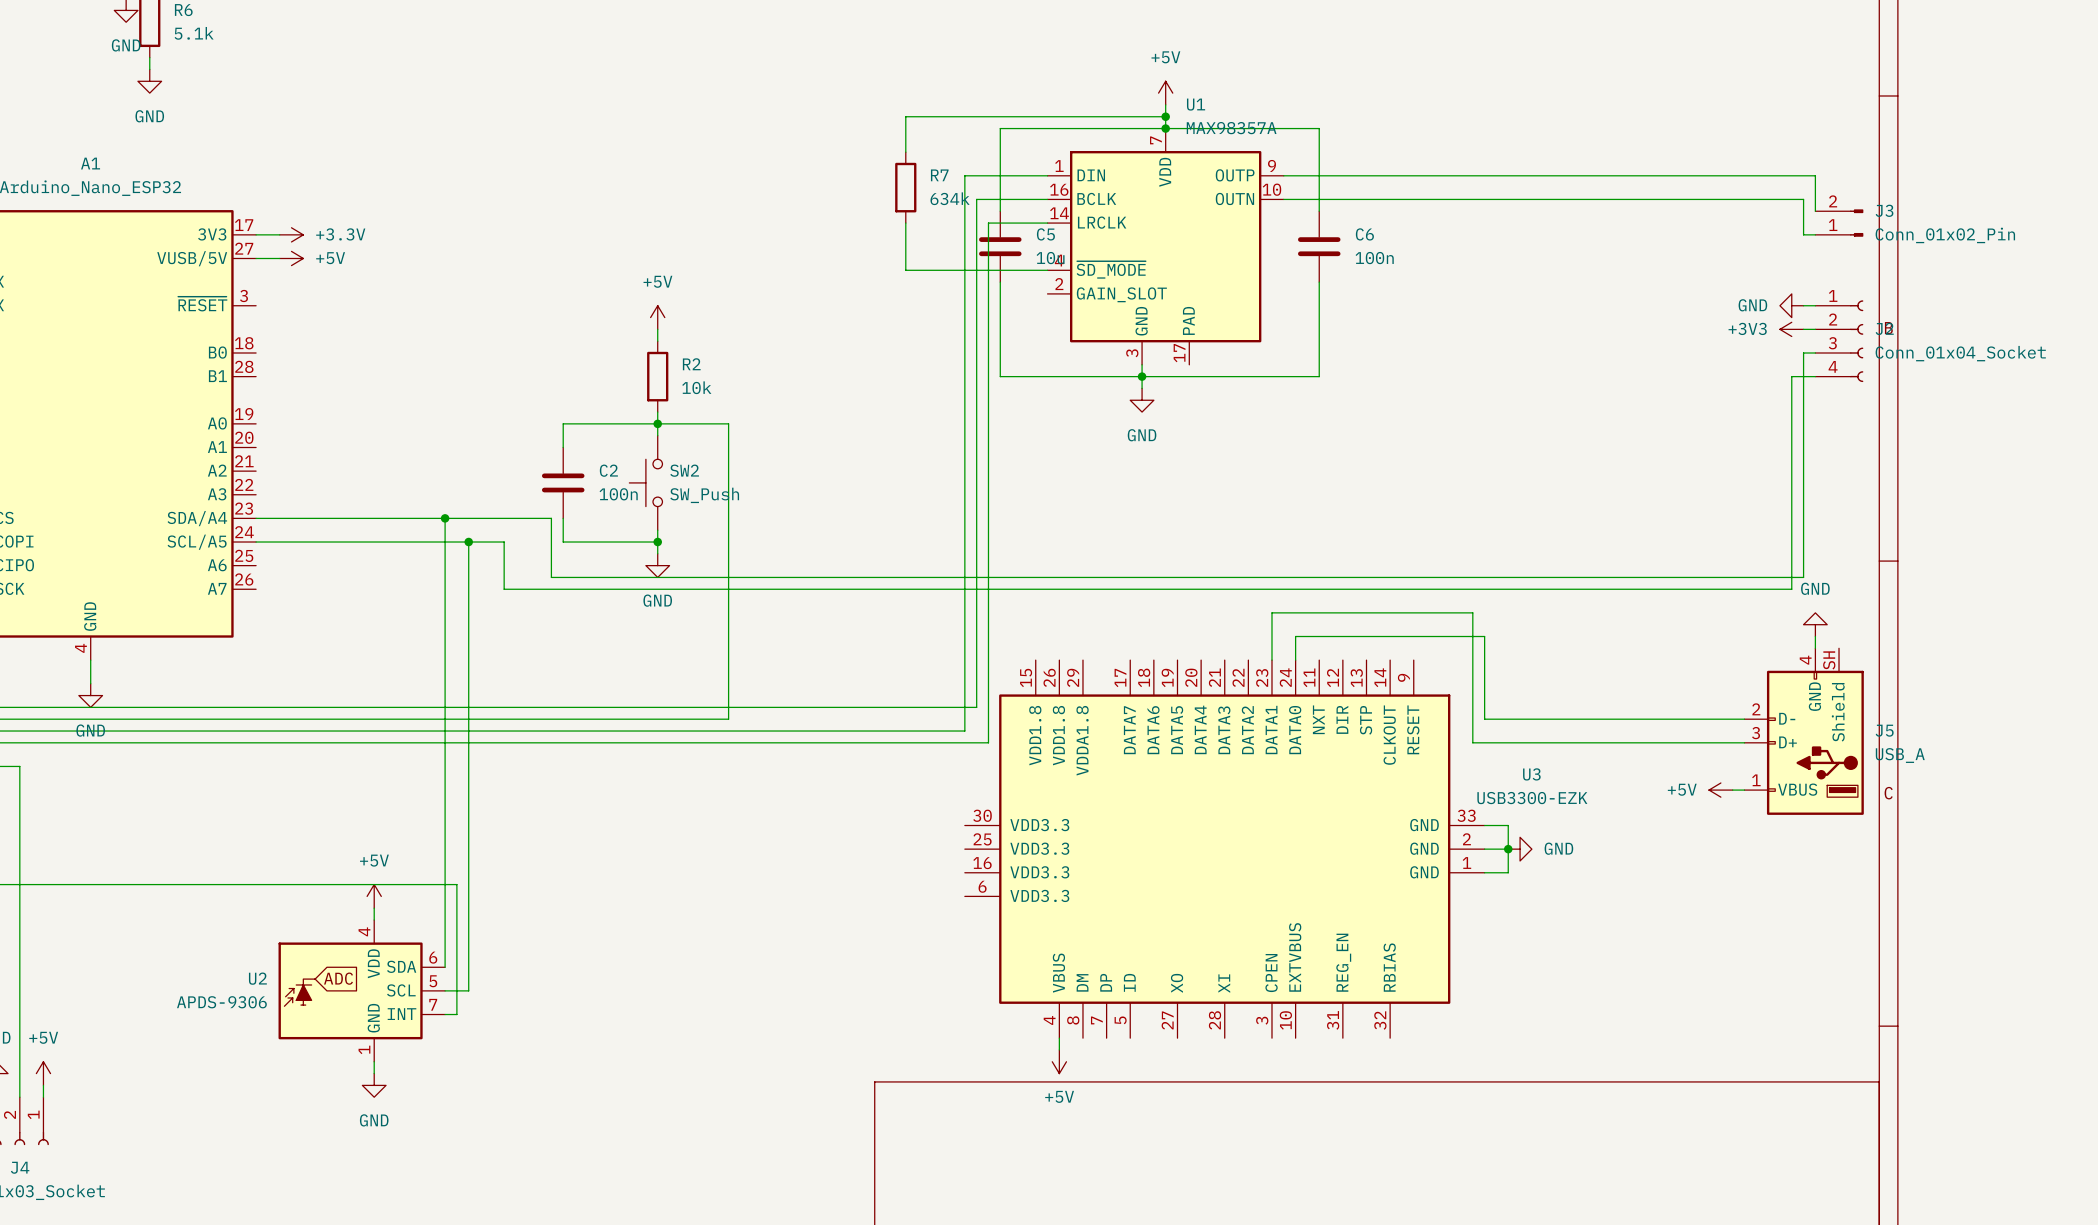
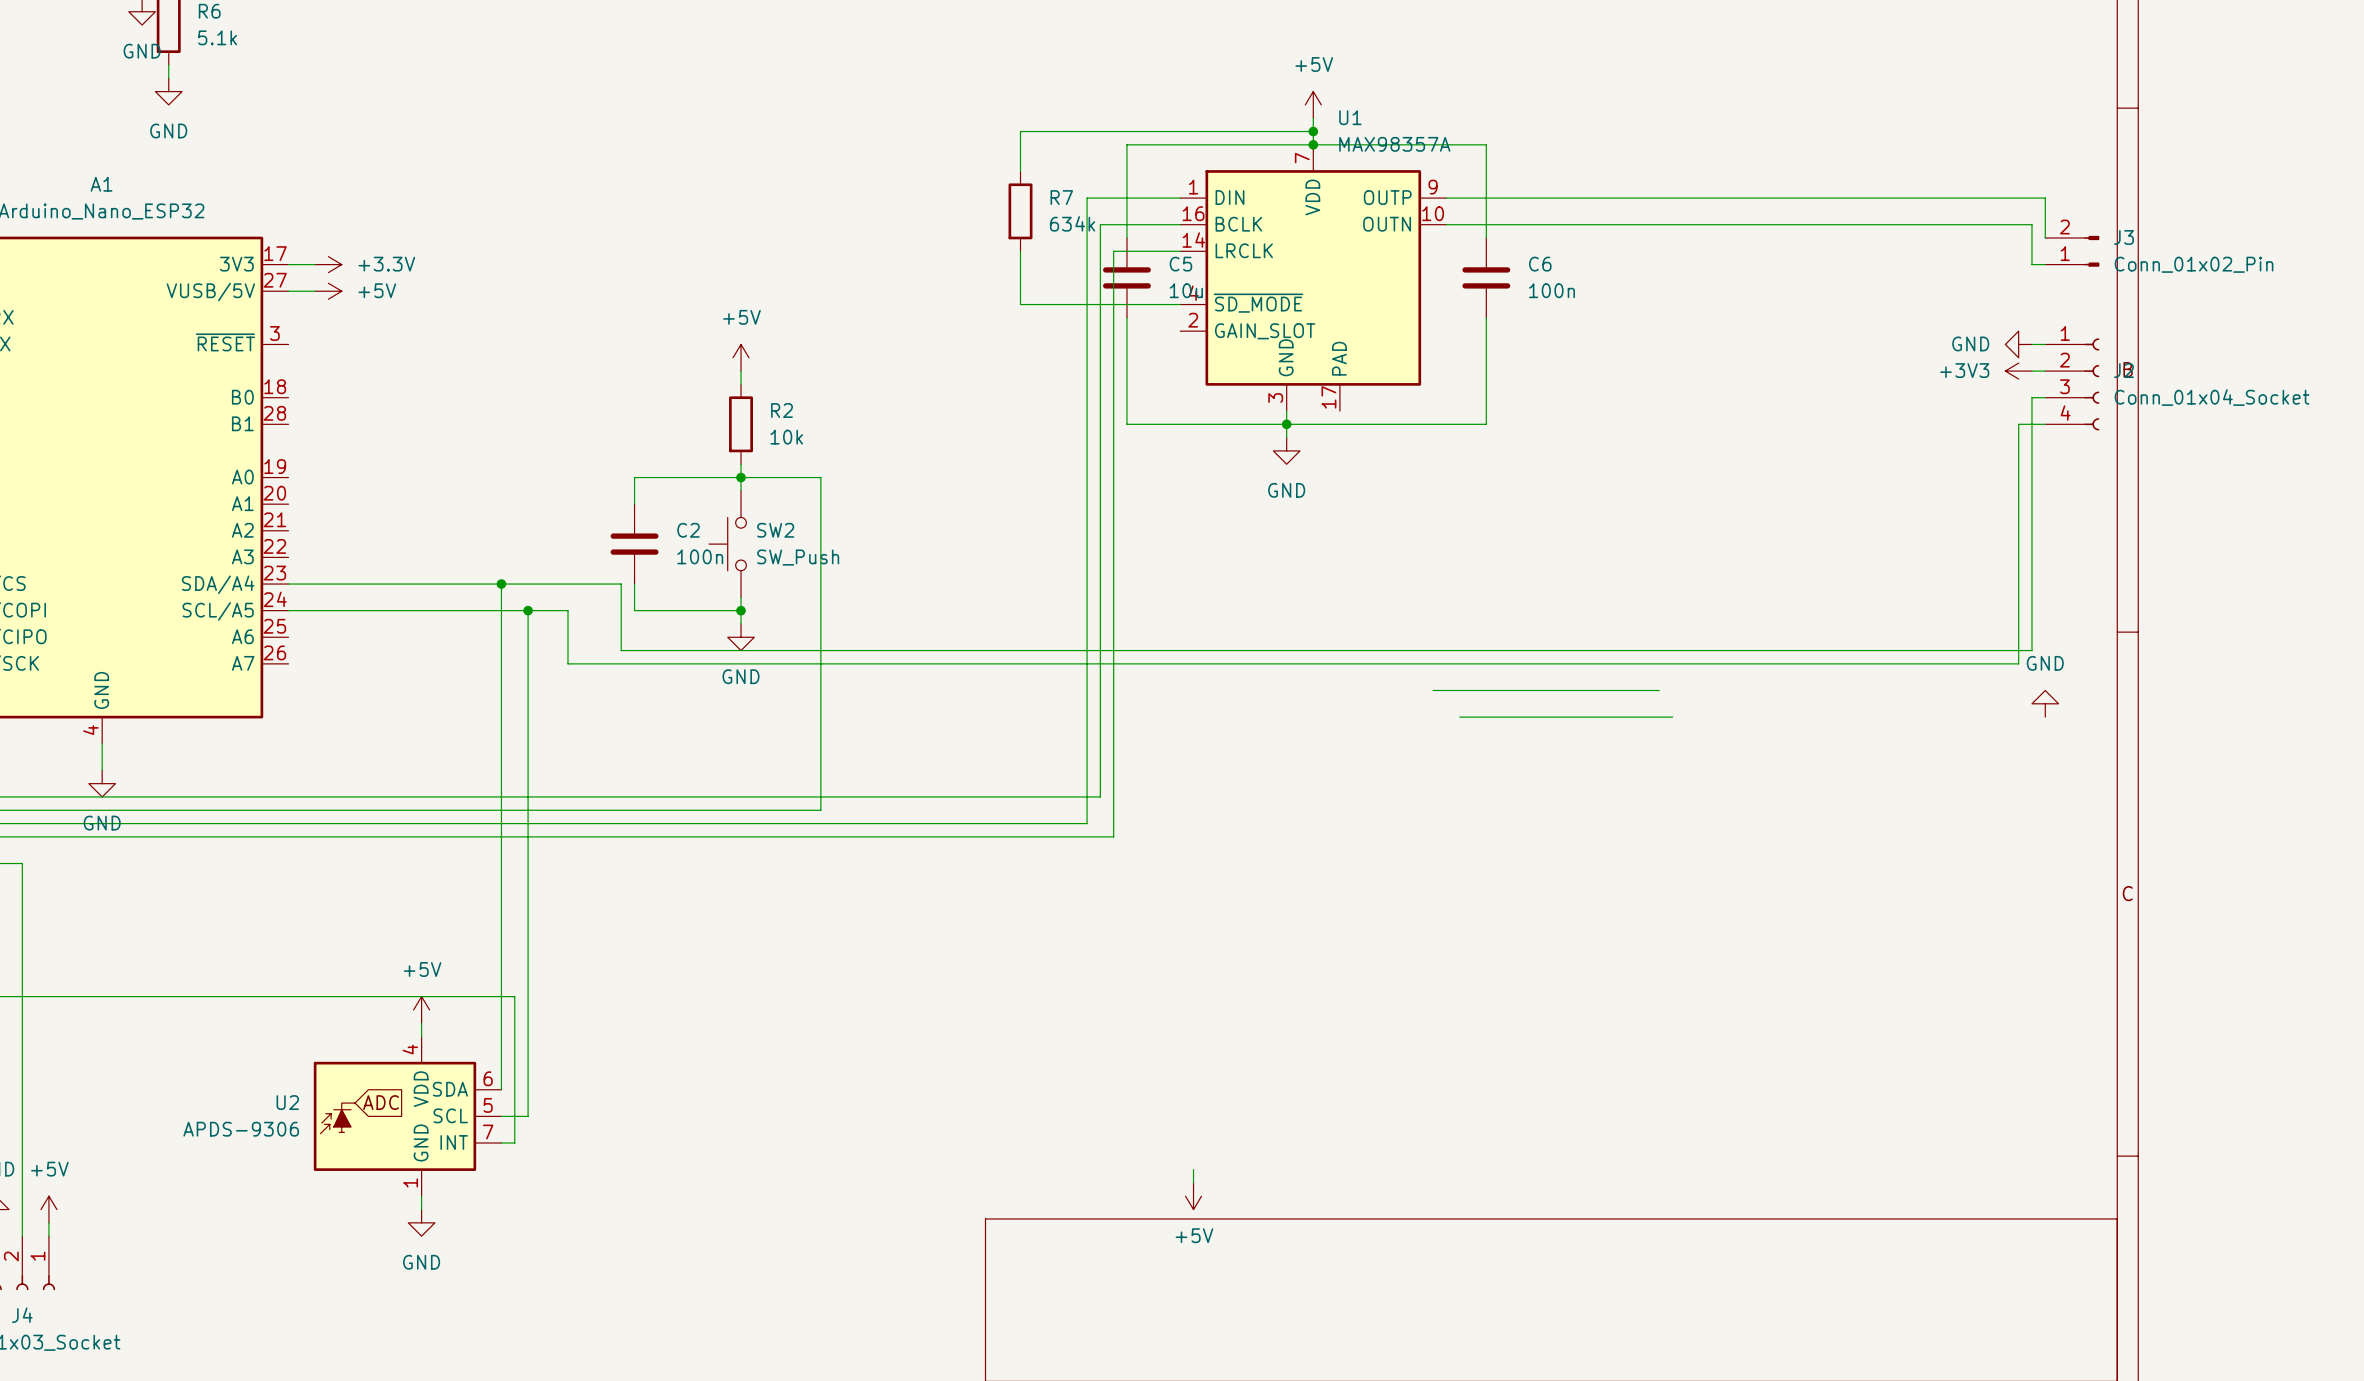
wire: (1271, 612) (1271, 660) -> none
wire: (1472, 612) (1472, 742) (1744, 742) -> none
wire: (1295, 636) (1295, 660) -> none
wire: (1484, 636) (1484, 719) (1744, 719) -> none
wire: (1815, 636) (1815, 648) -> none
J5: USB_A (1804, 731) -> none
power symbol: +5V (1720, 790) -> none
wire: (1732, 790) (1744, 790) -> none
wire: (1484, 825) (1508, 825) (1508, 872) (1484, 872) -> none
U3: USB3300-EZK (1224, 849) -> none
wire: (1484, 849) (1508, 849) -> none
junction: (1508, 849) -> none
power symbol: GND (1520, 849) -> none

